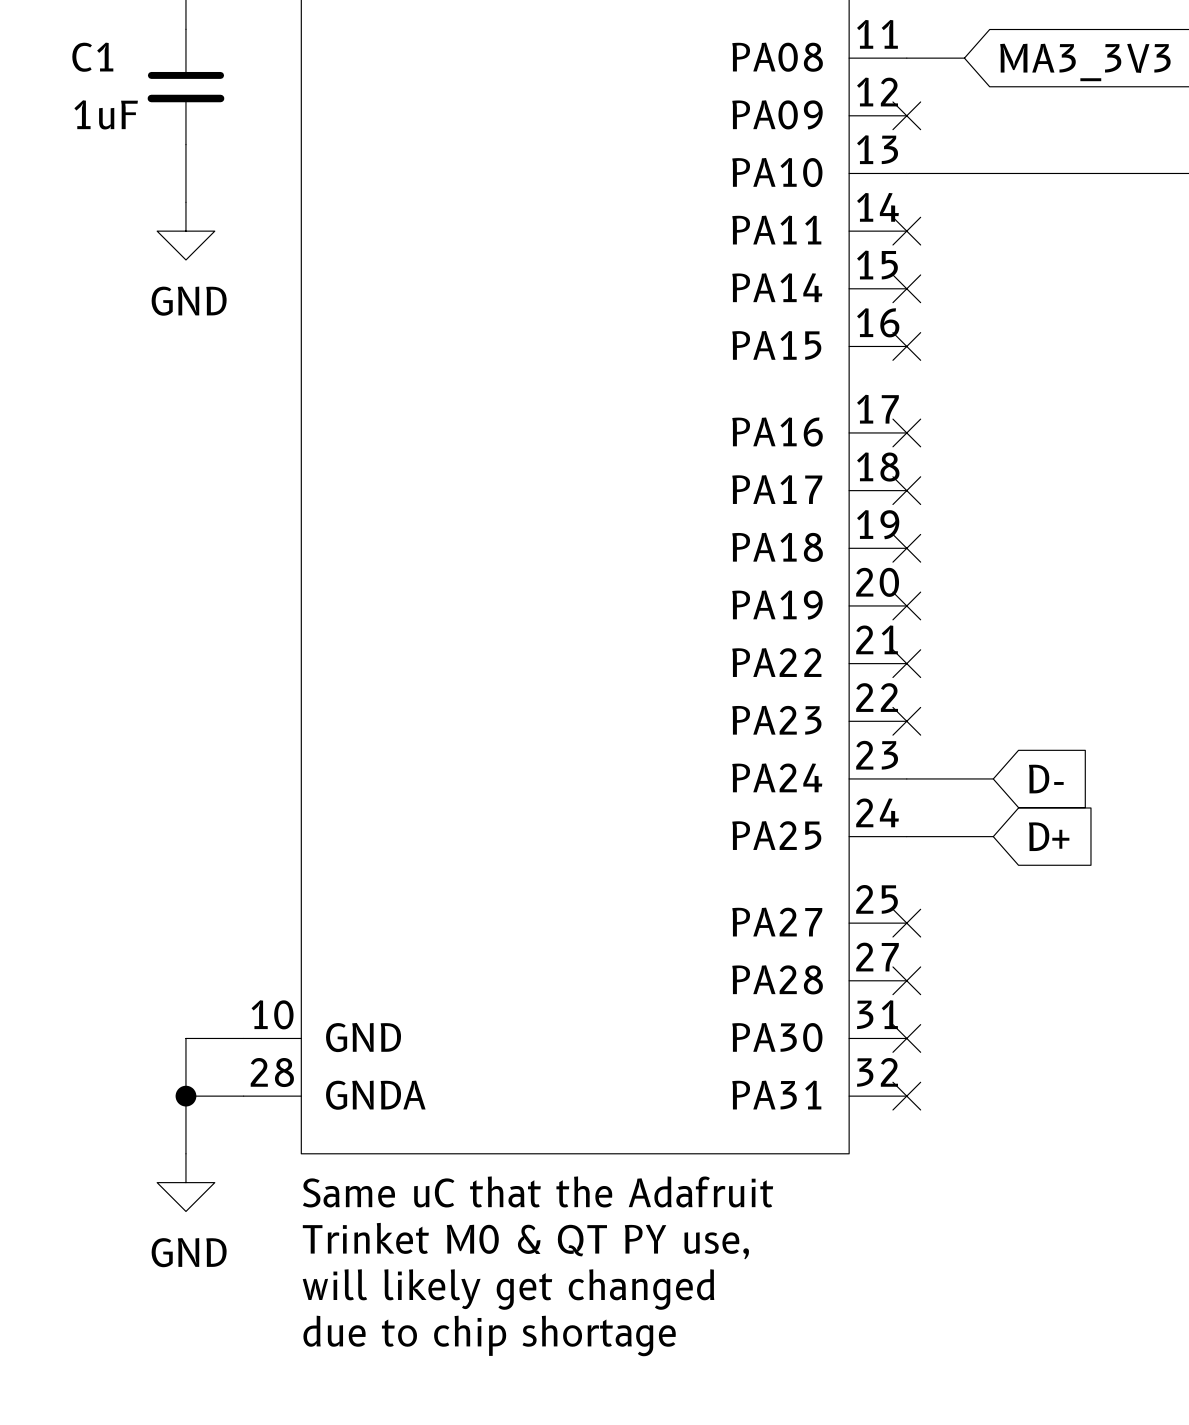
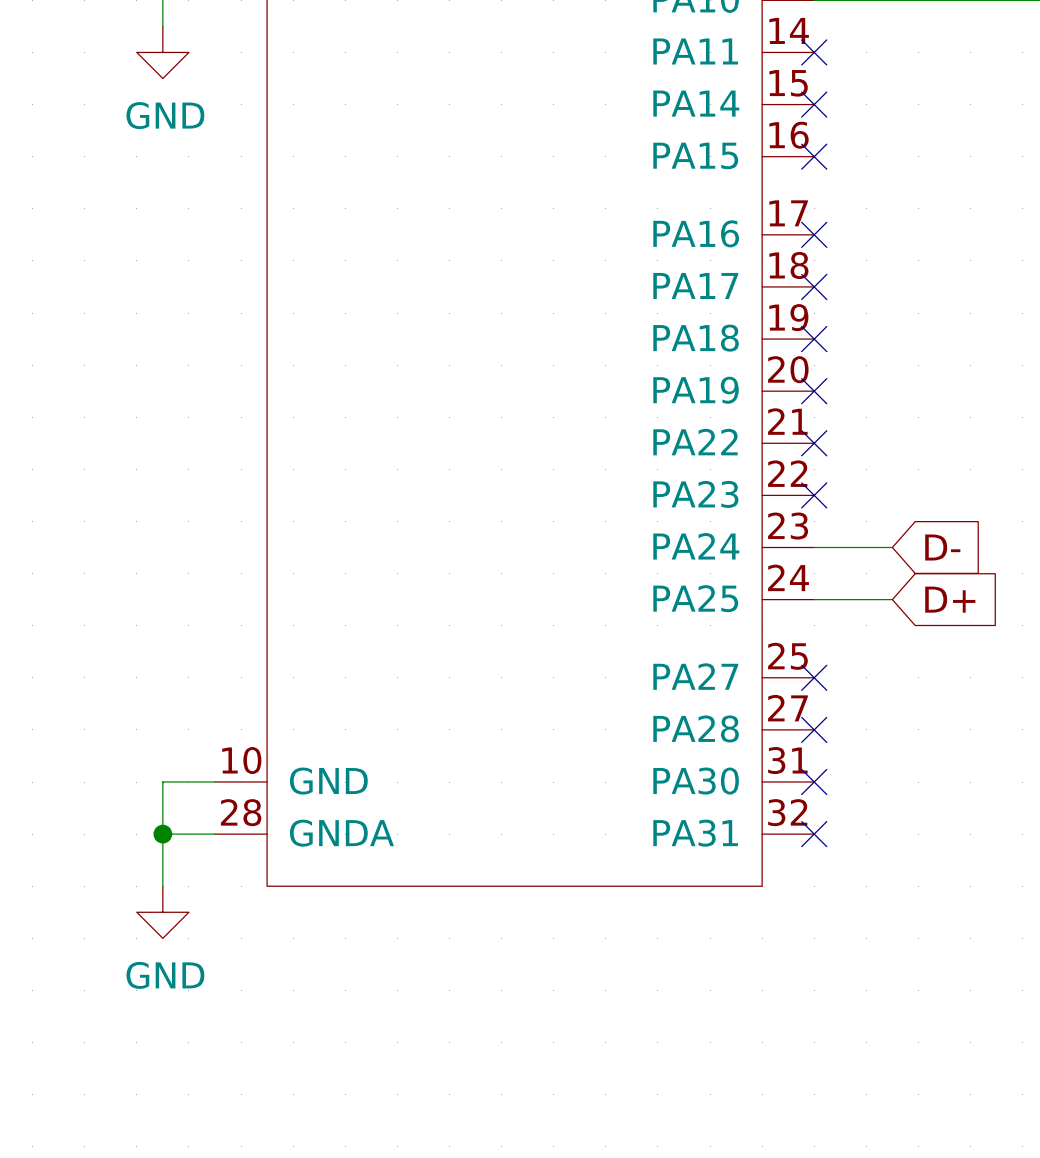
text: Same uC that the Adafruit (538, 1191) -> none
text: Trinket M0 & QT PY use, (525, 1241) -> none
text: will likely get changed (508, 1289) -> none
text: due to chip shortage (489, 1335) -> none

